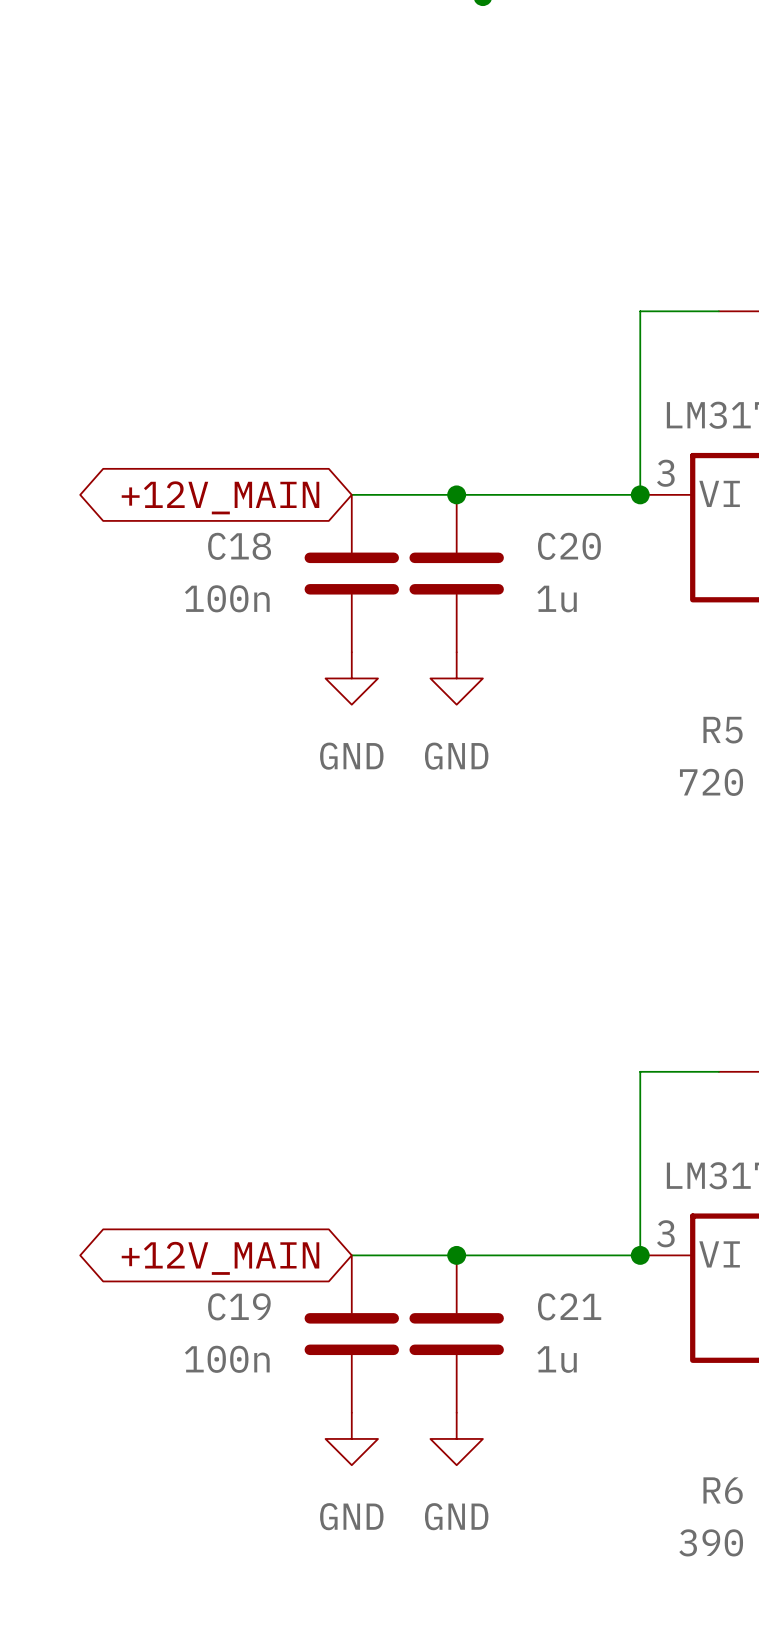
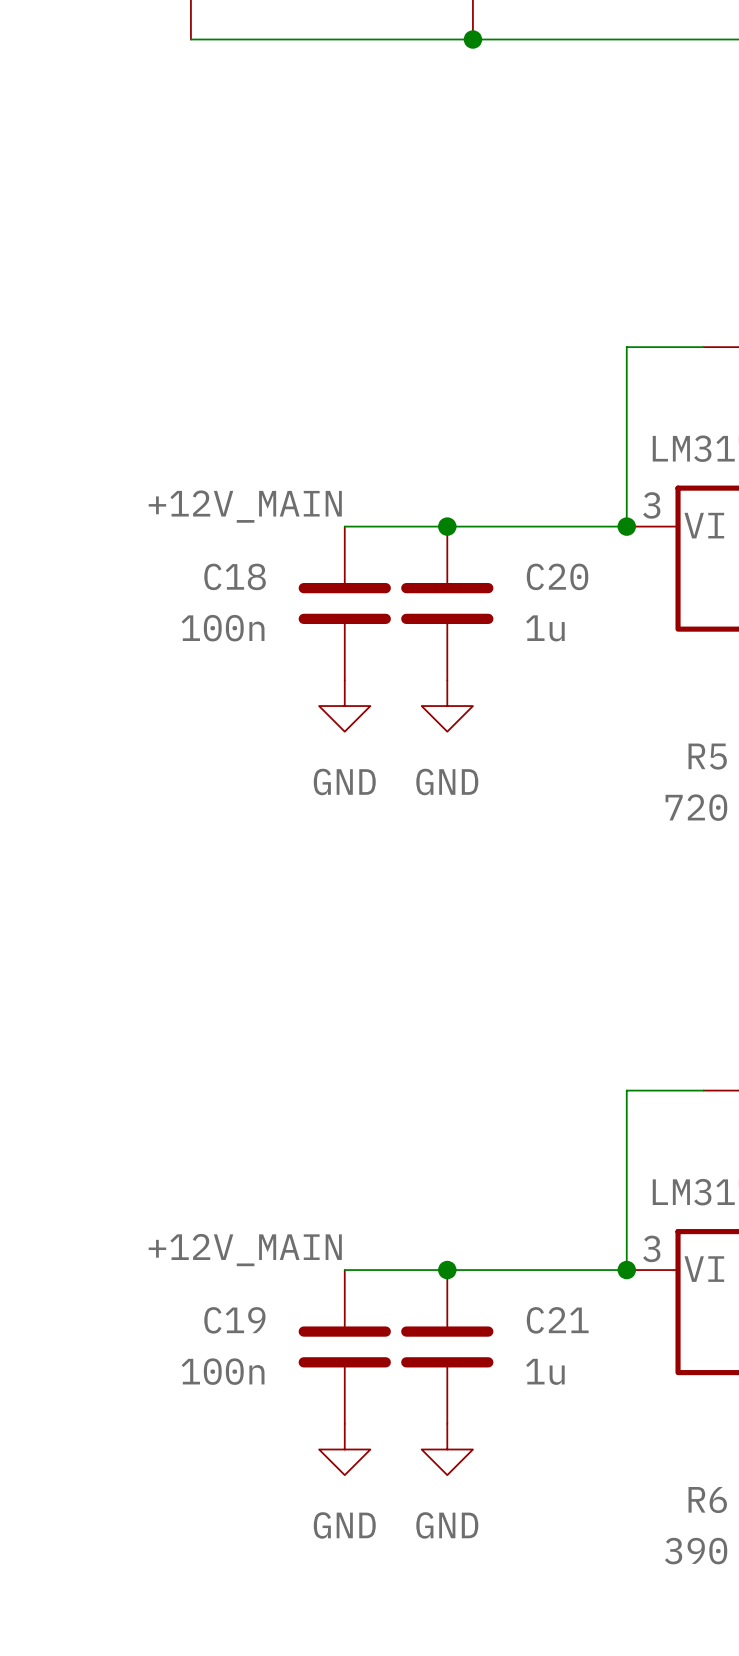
label: none -> +12V_MAIN (245, 506)
global label: +12V_MAIN (220, 497) -> none
label: none -> +12V_MAIN (245, 1250)
global label: +12V_MAIN (220, 1258) -> none

